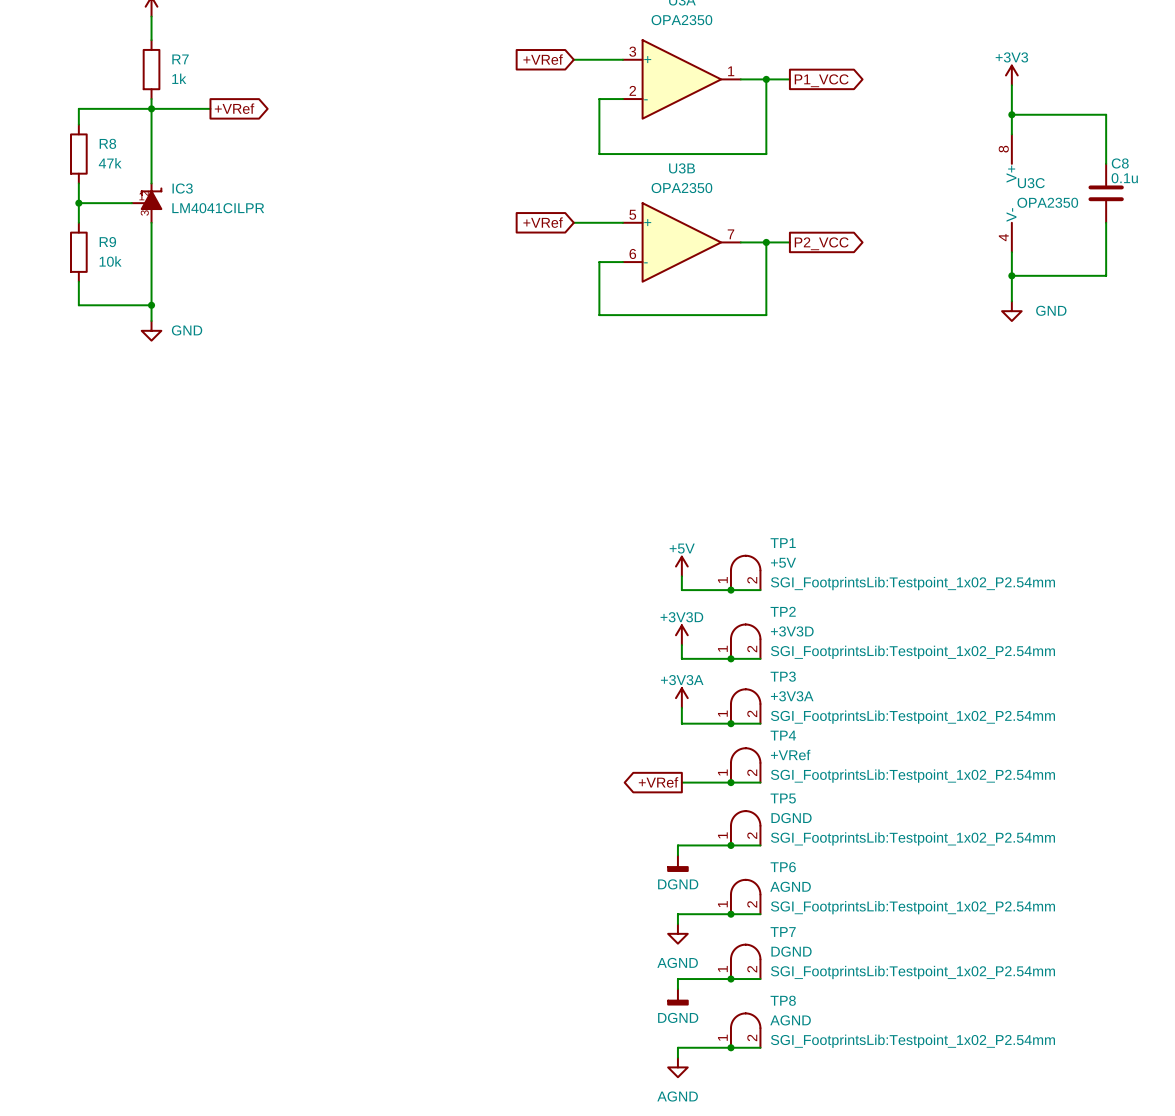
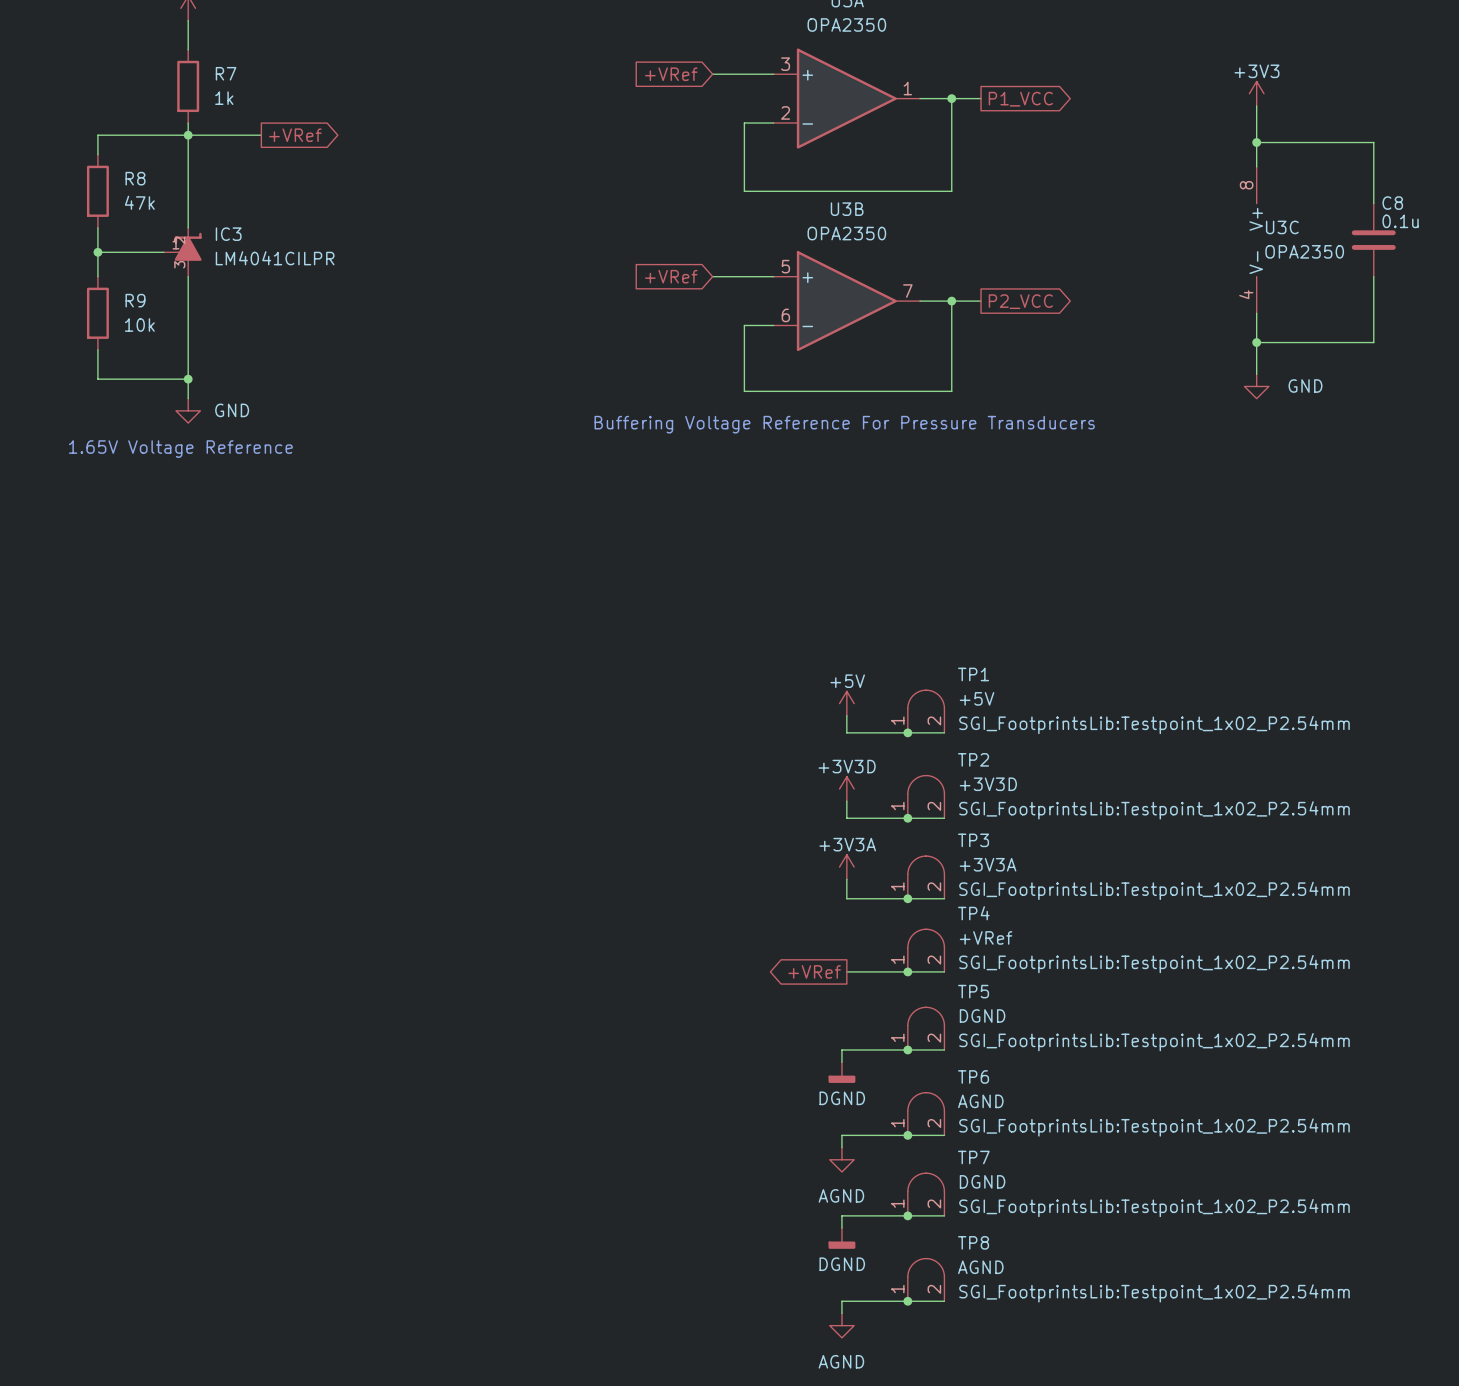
text: none -> Buffering Voltage Reference For Pressure Transducers (844, 424)
text: none -> 1.65V Voltage Reference (180, 449)

